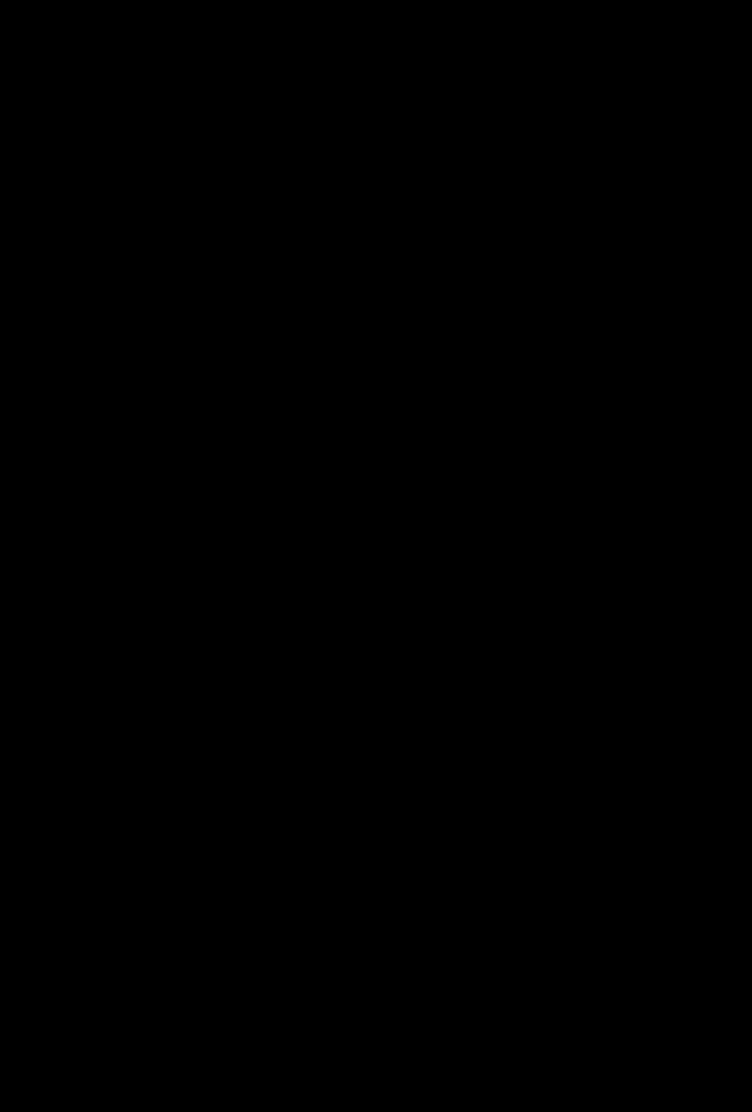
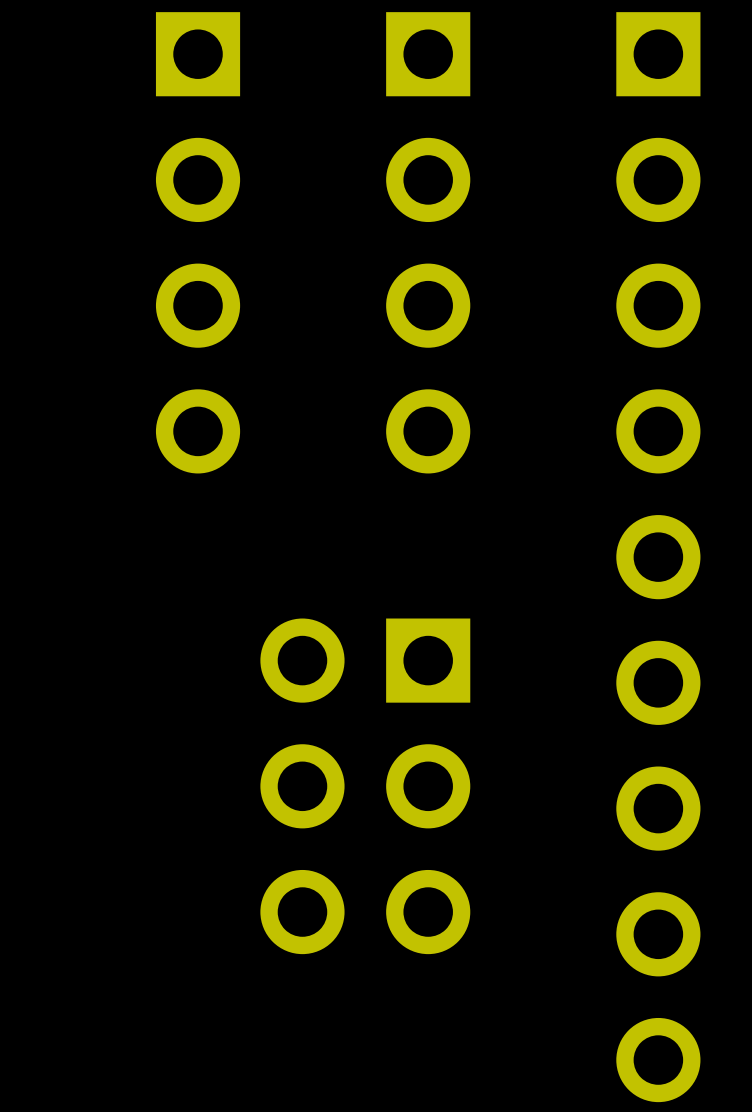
part: none -> (198, 242)
part: none -> (428, 242)
part: none -> (658, 557)
part: none -> (365, 786)

